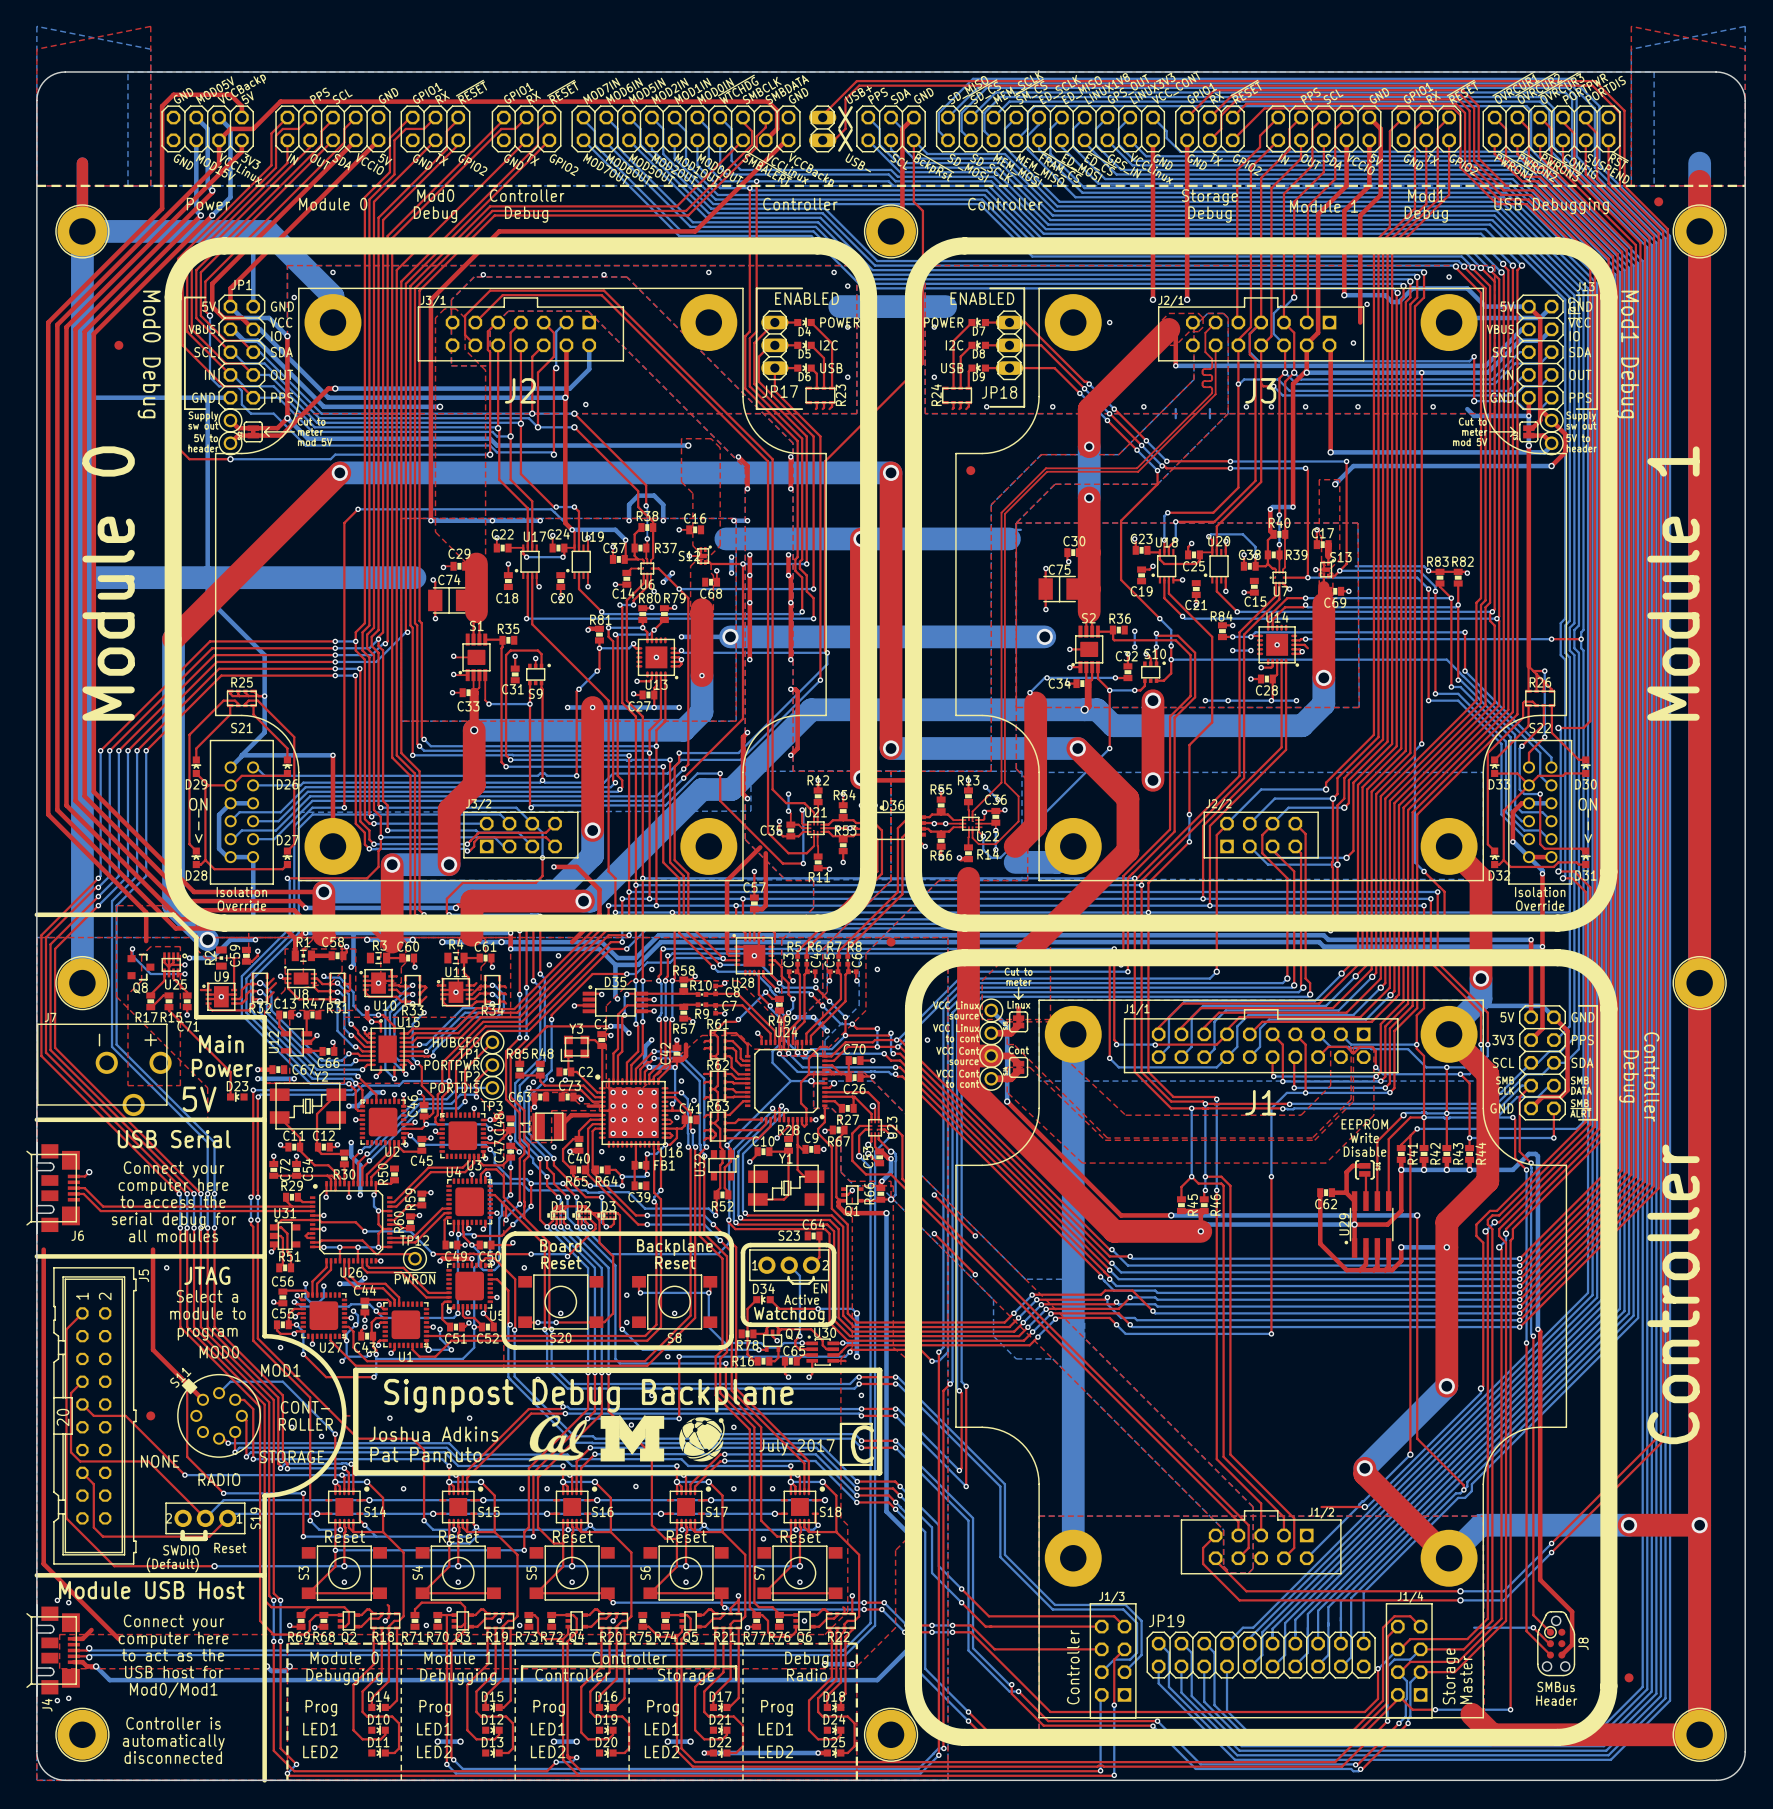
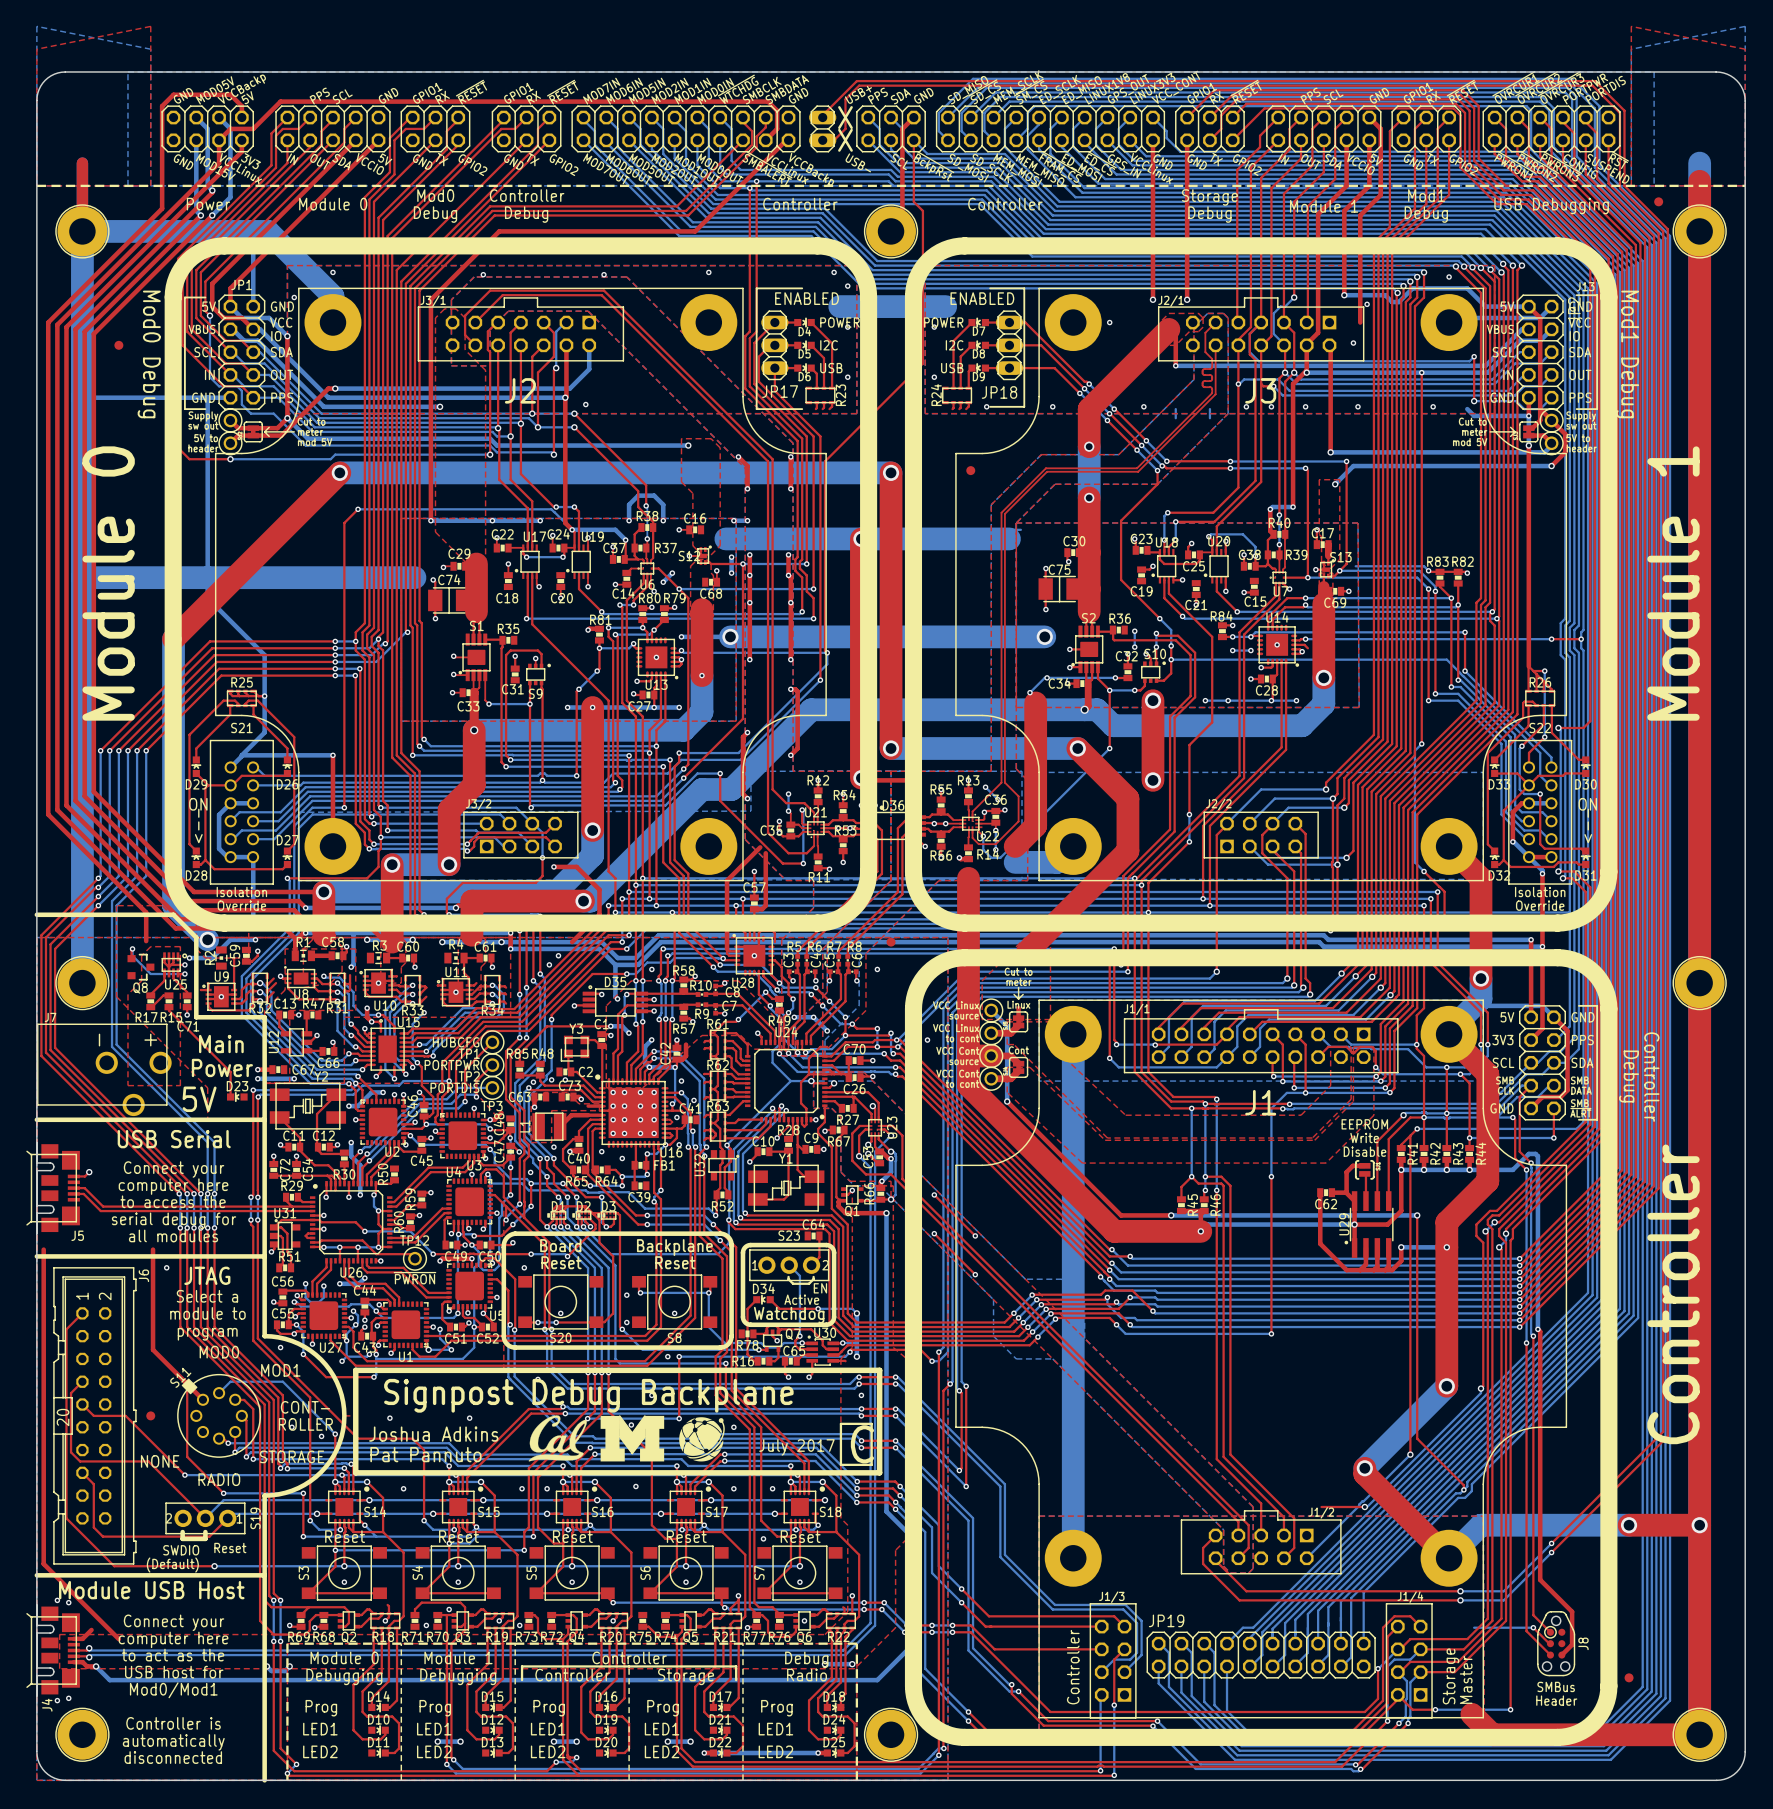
J6 name: J6 (77, 1235) -> J5 (77, 1235)
J5 name: J5 (143, 1275) -> J6 (143, 1275)

